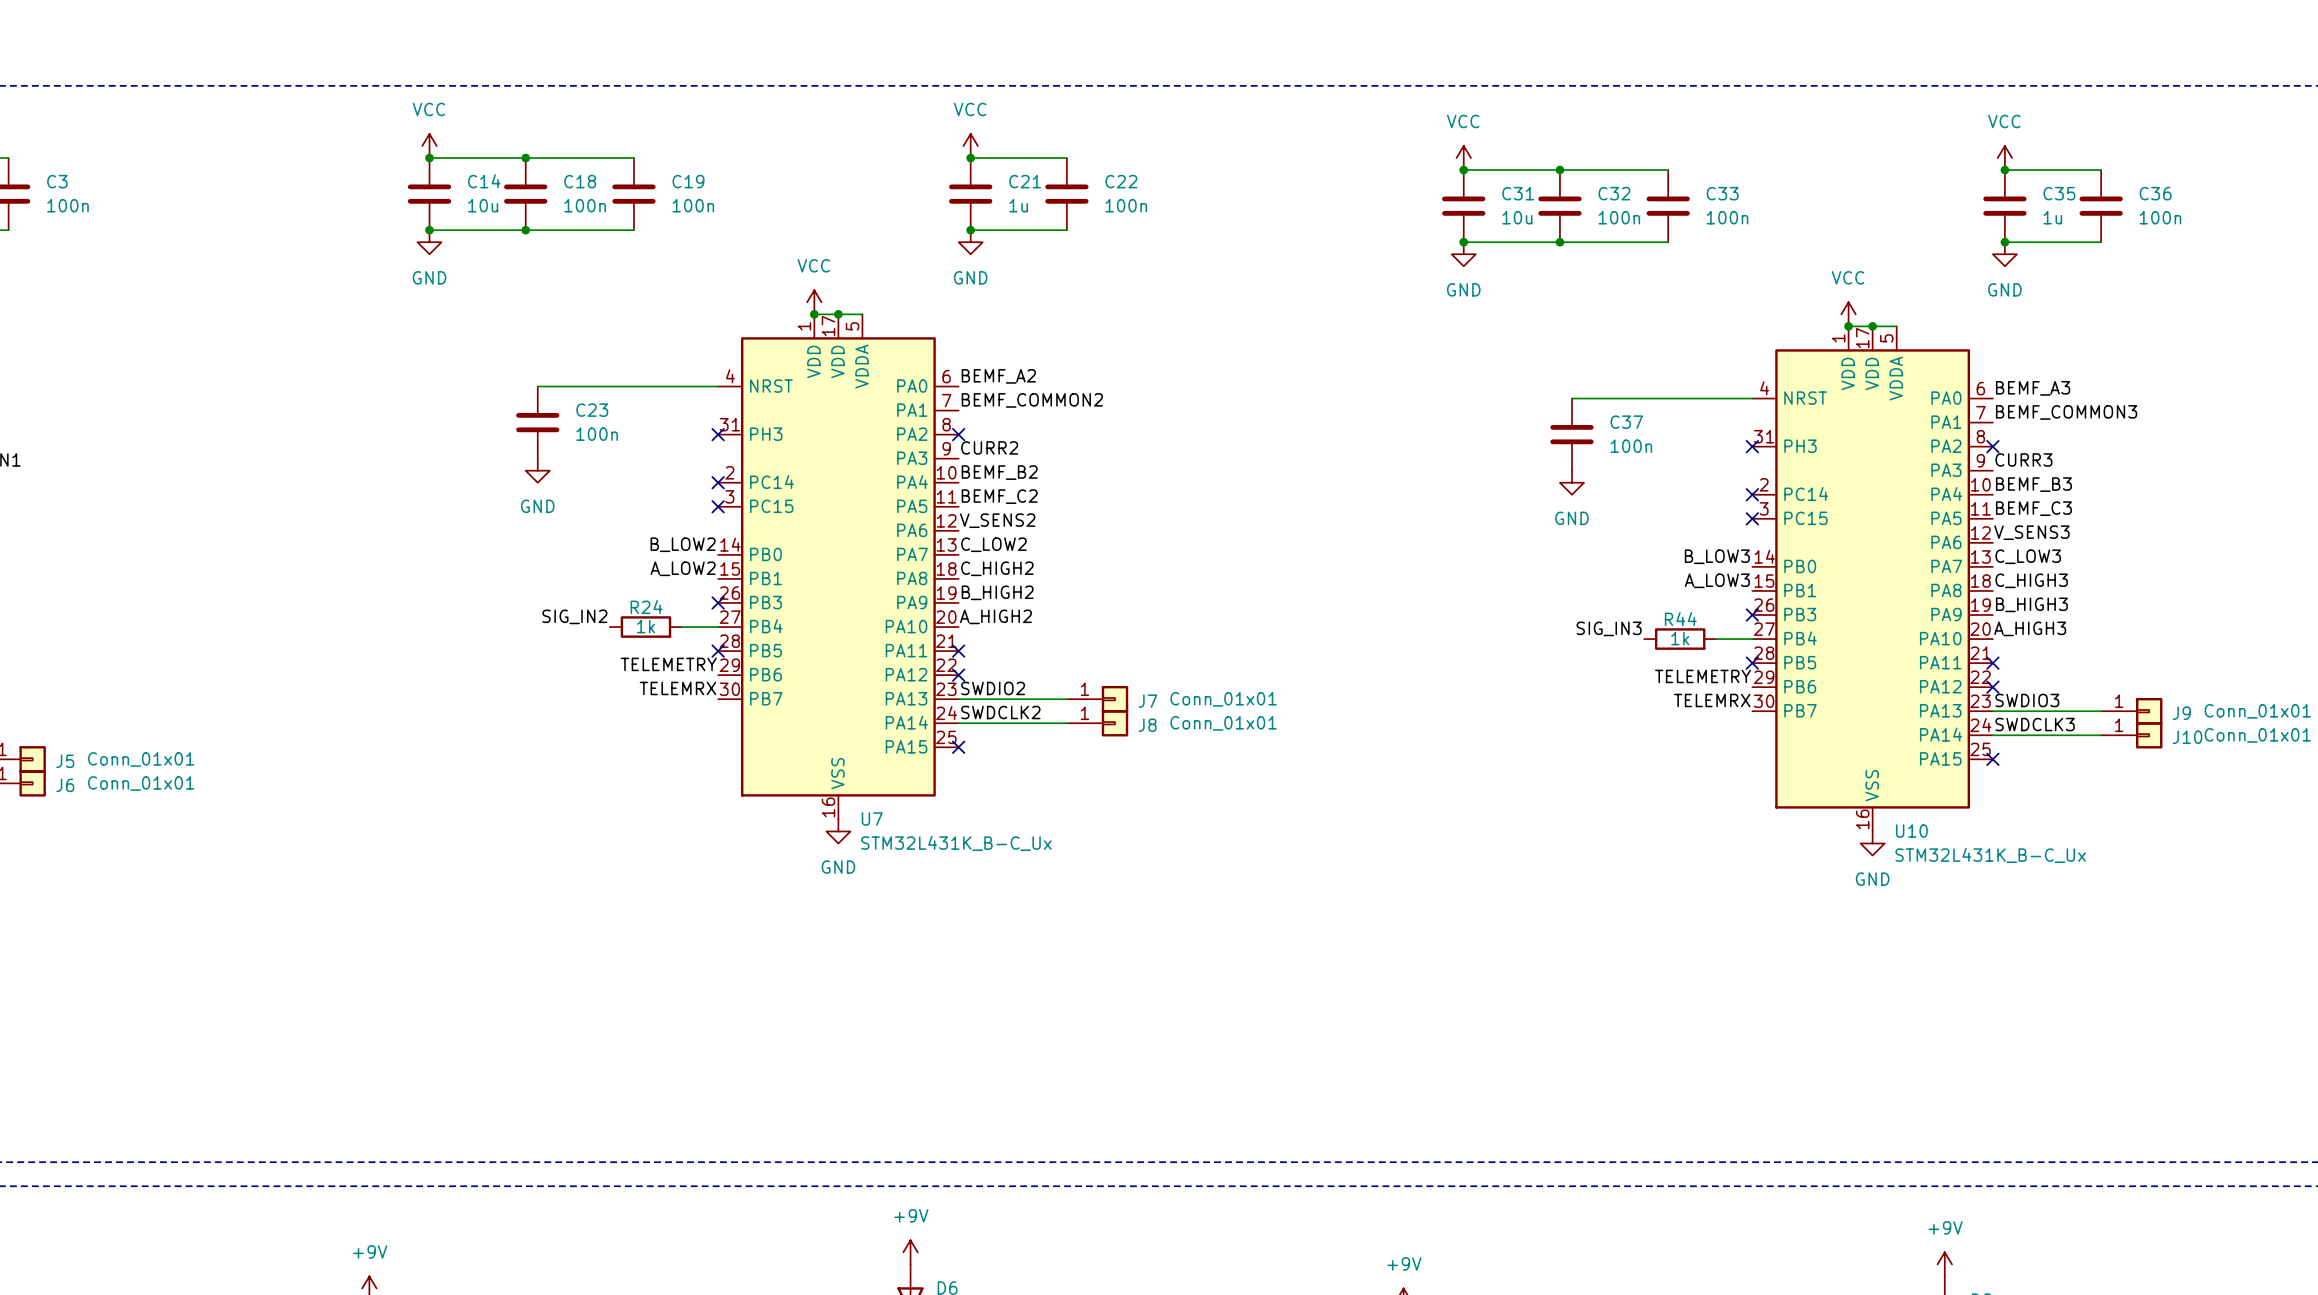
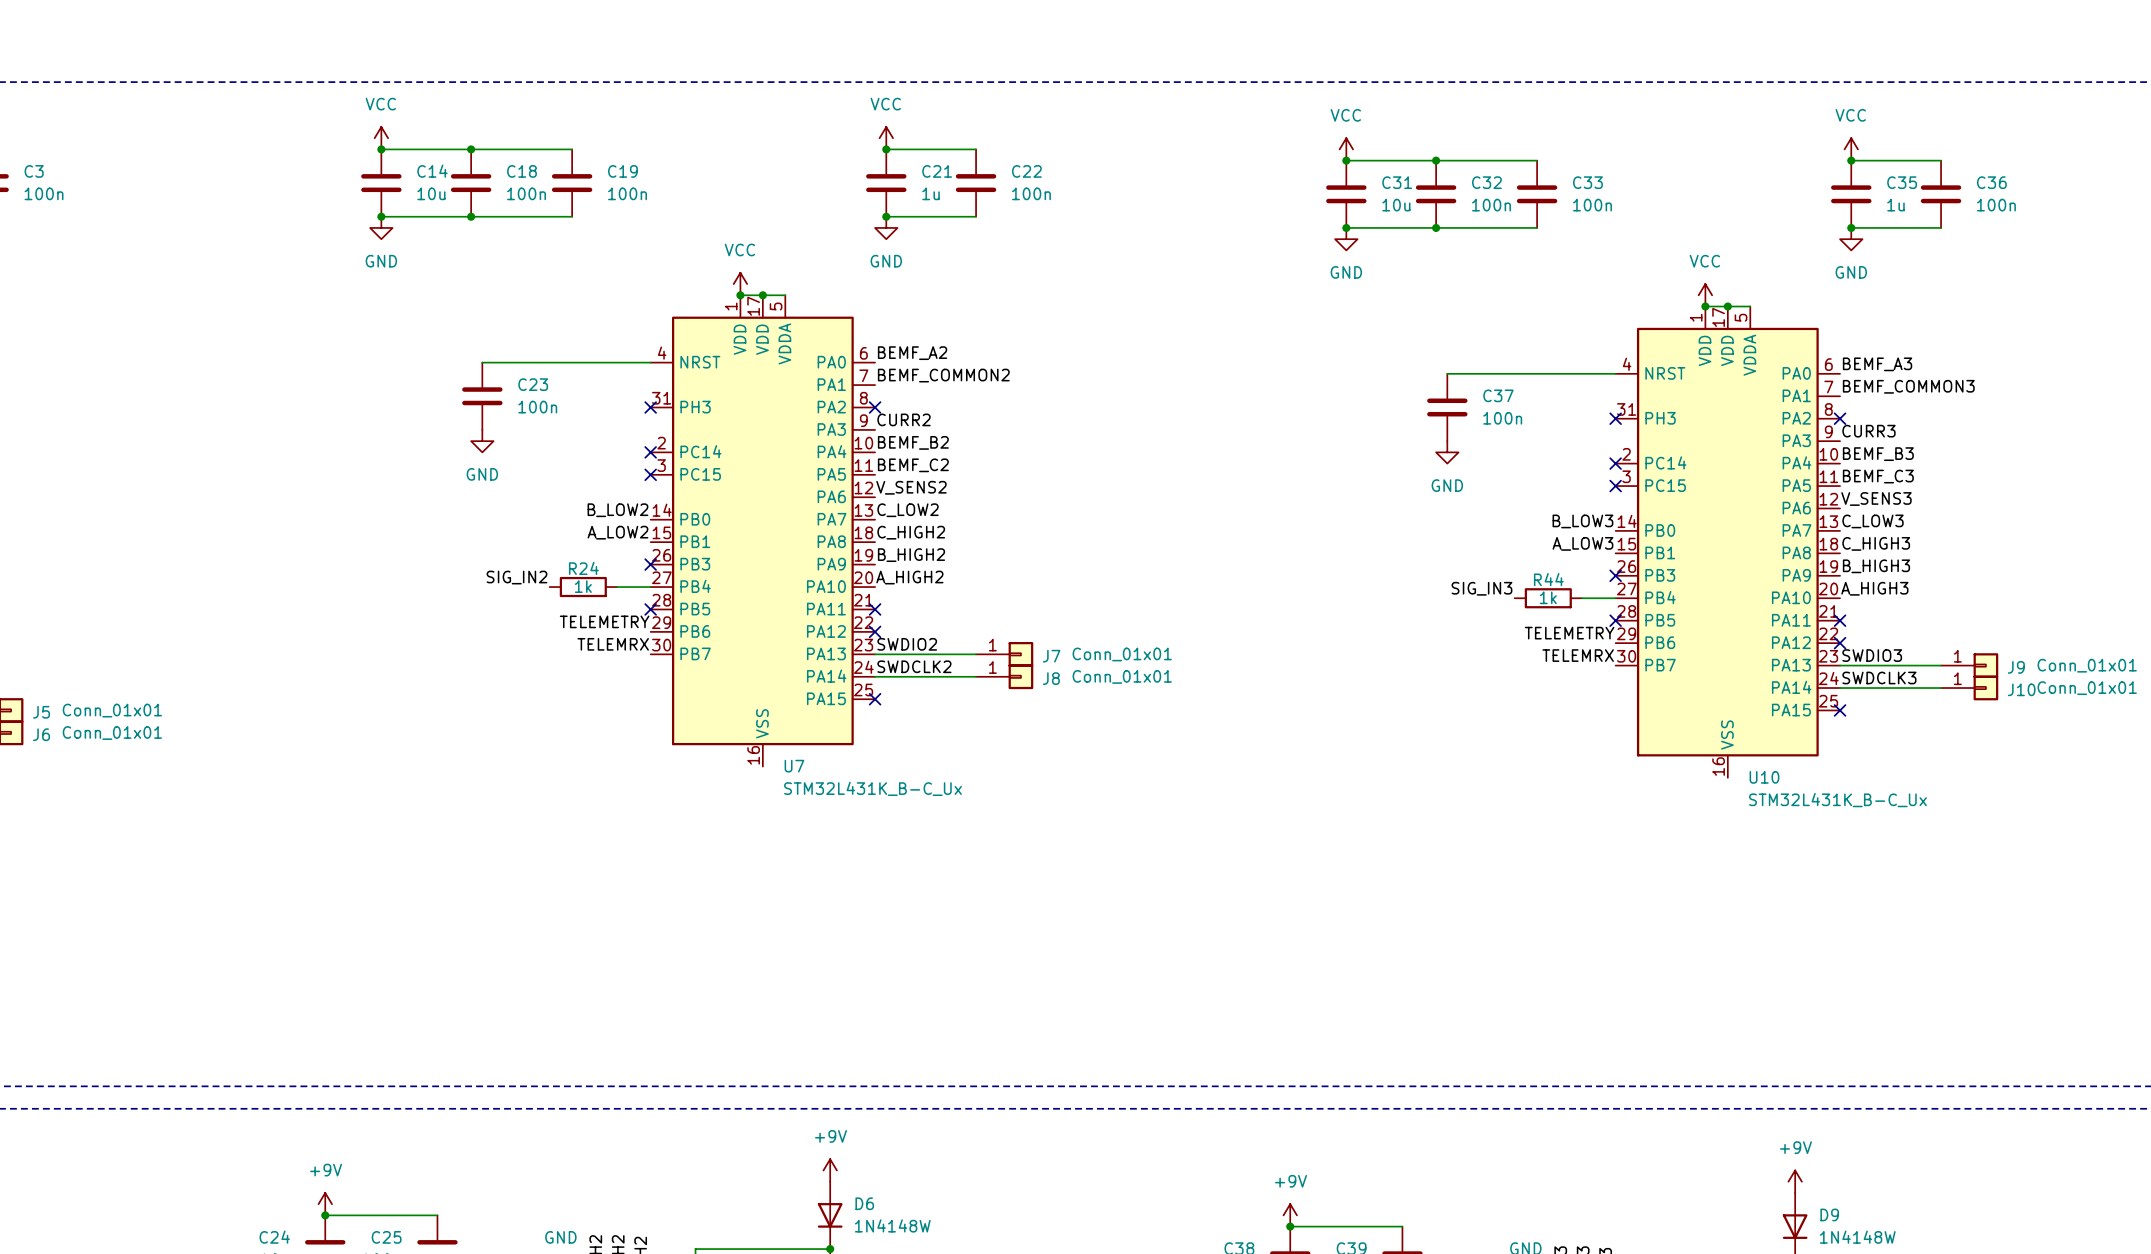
power symbol: GND (838, 831) -> none
power symbol: GND (1872, 843) -> none

